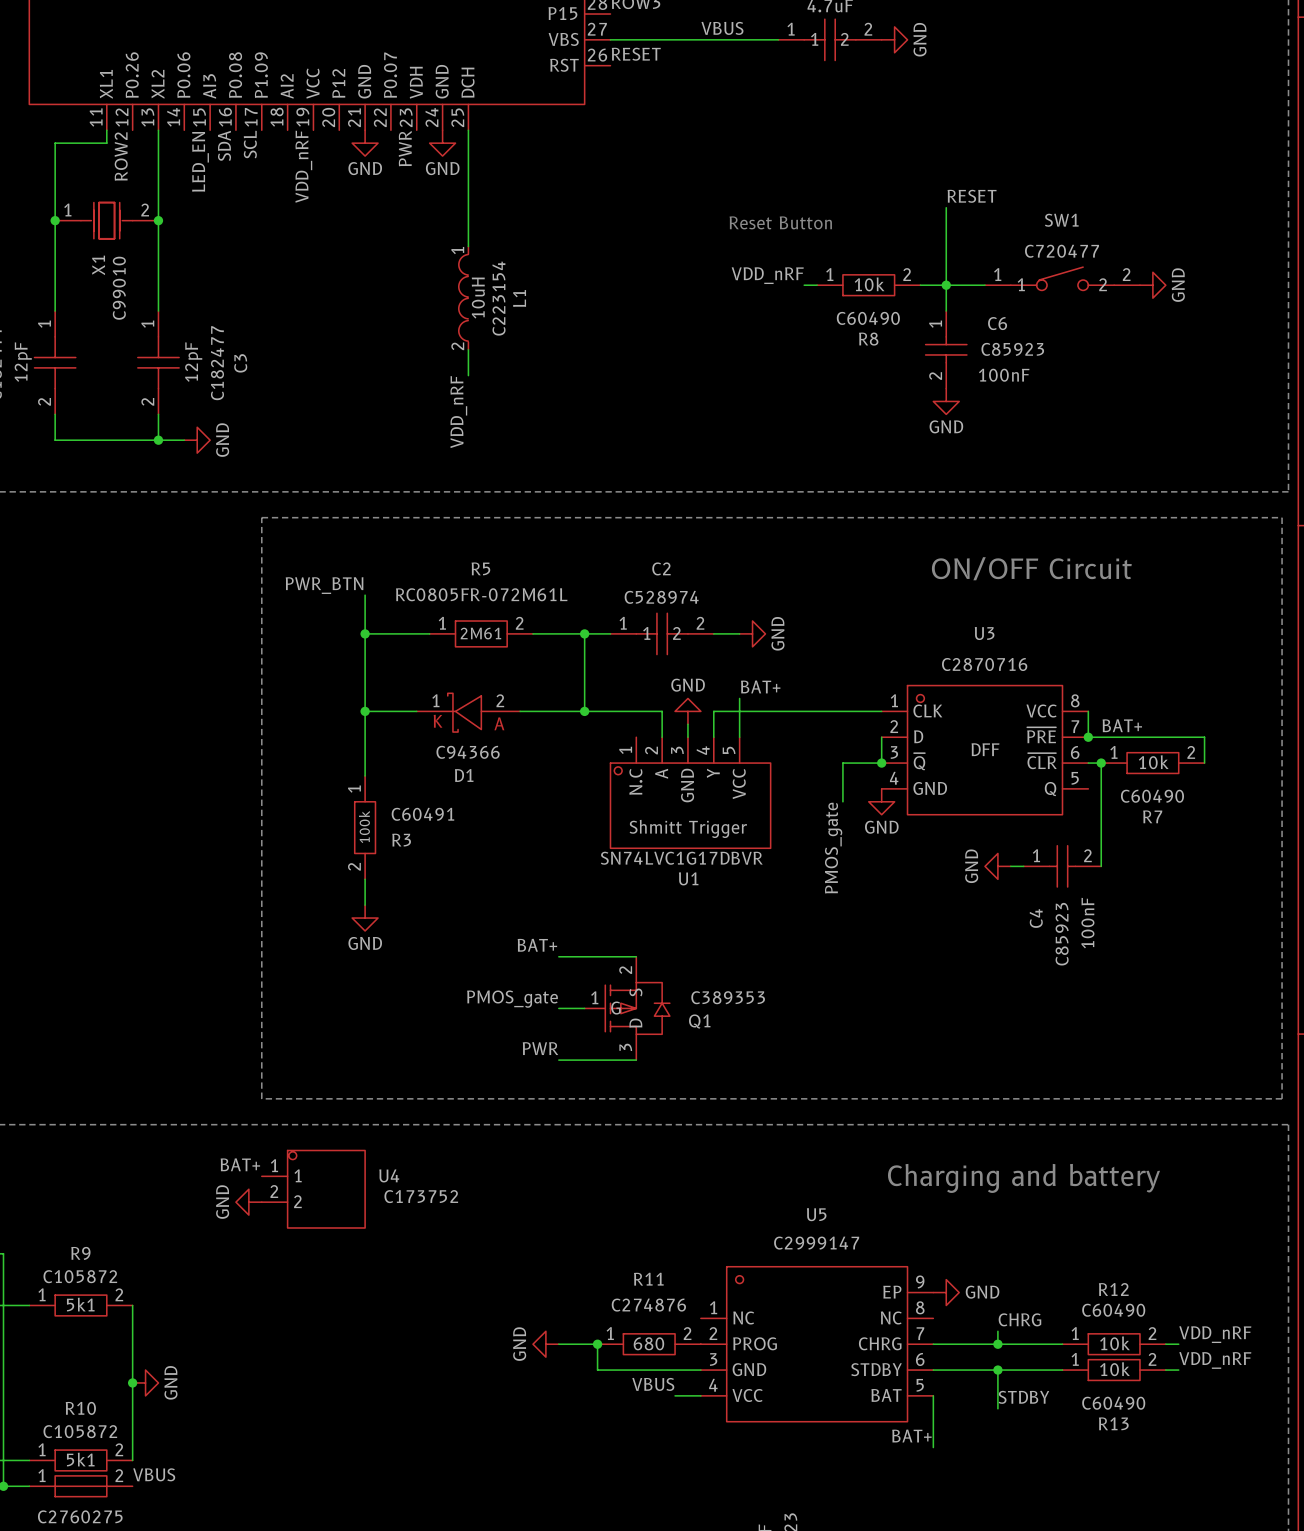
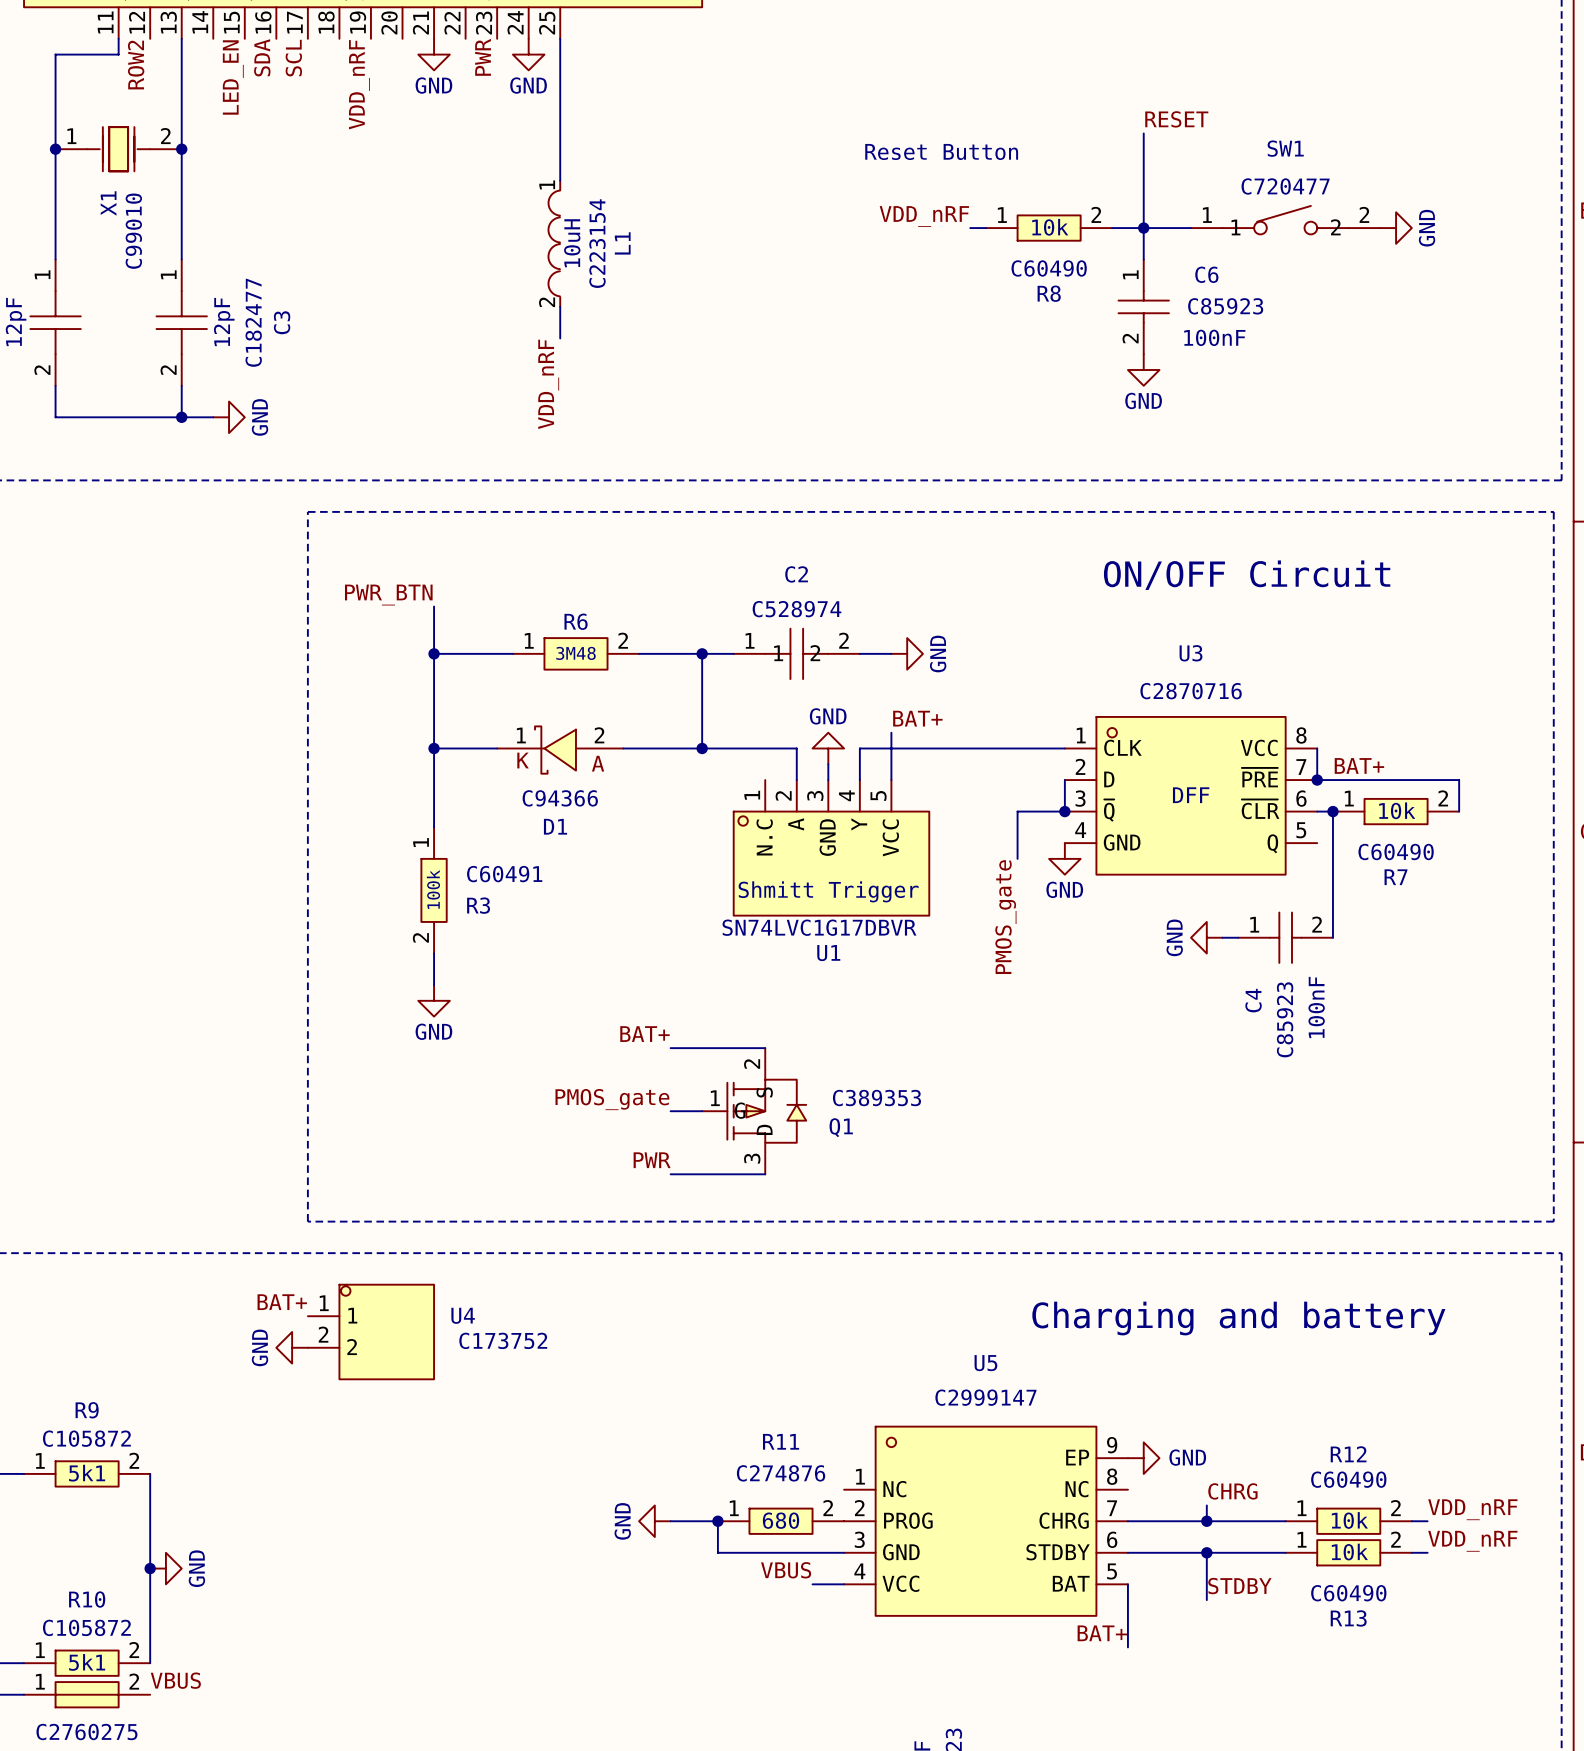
R5 name: R5 (480, 568) -> R6 (576, 621)
R5 value: RC0805FR-072M61L (481, 594) -> none
R5 text: 2M61 (480, 633) -> 3M48 (576, 653)

